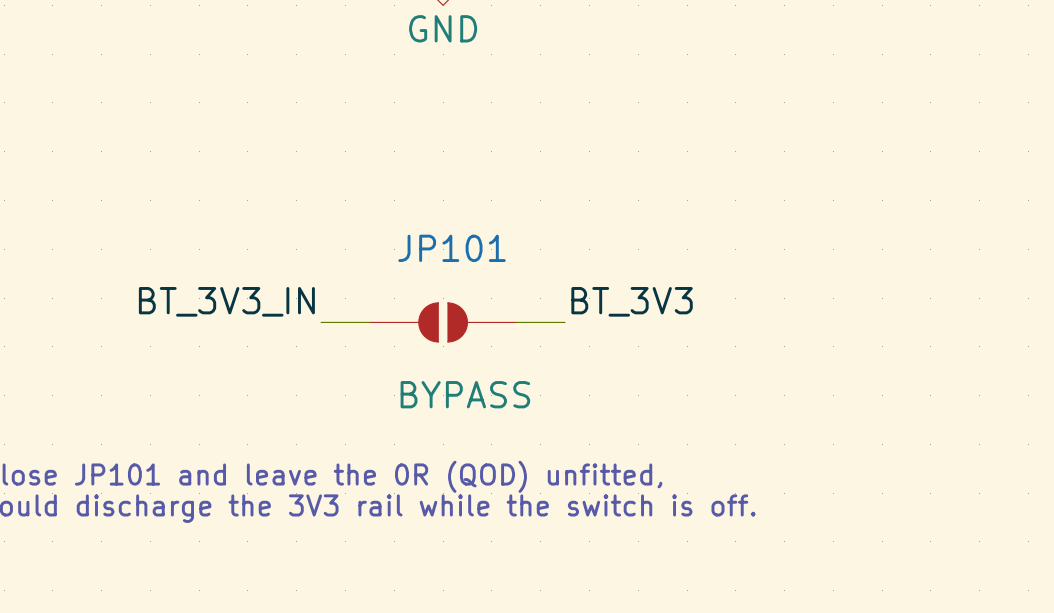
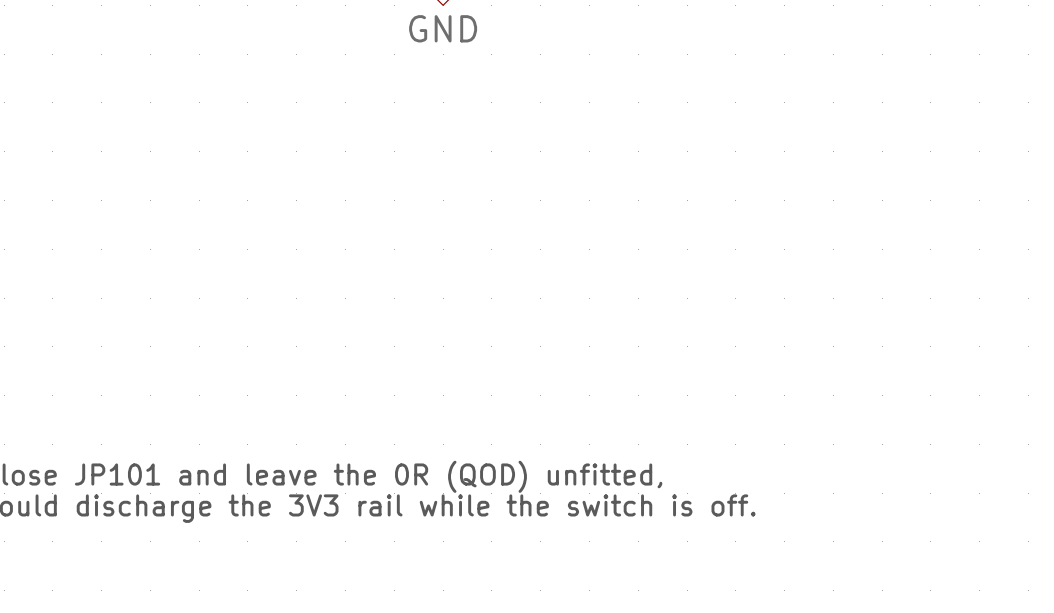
label: BT_3V3_IN (226, 301) -> none
label: BT_3V3 (632, 301) -> none
wire: (321, 322) (369, 322) -> none
JP101: BYPASS (443, 322) -> none
wire: (516, 322) (565, 322) -> none

